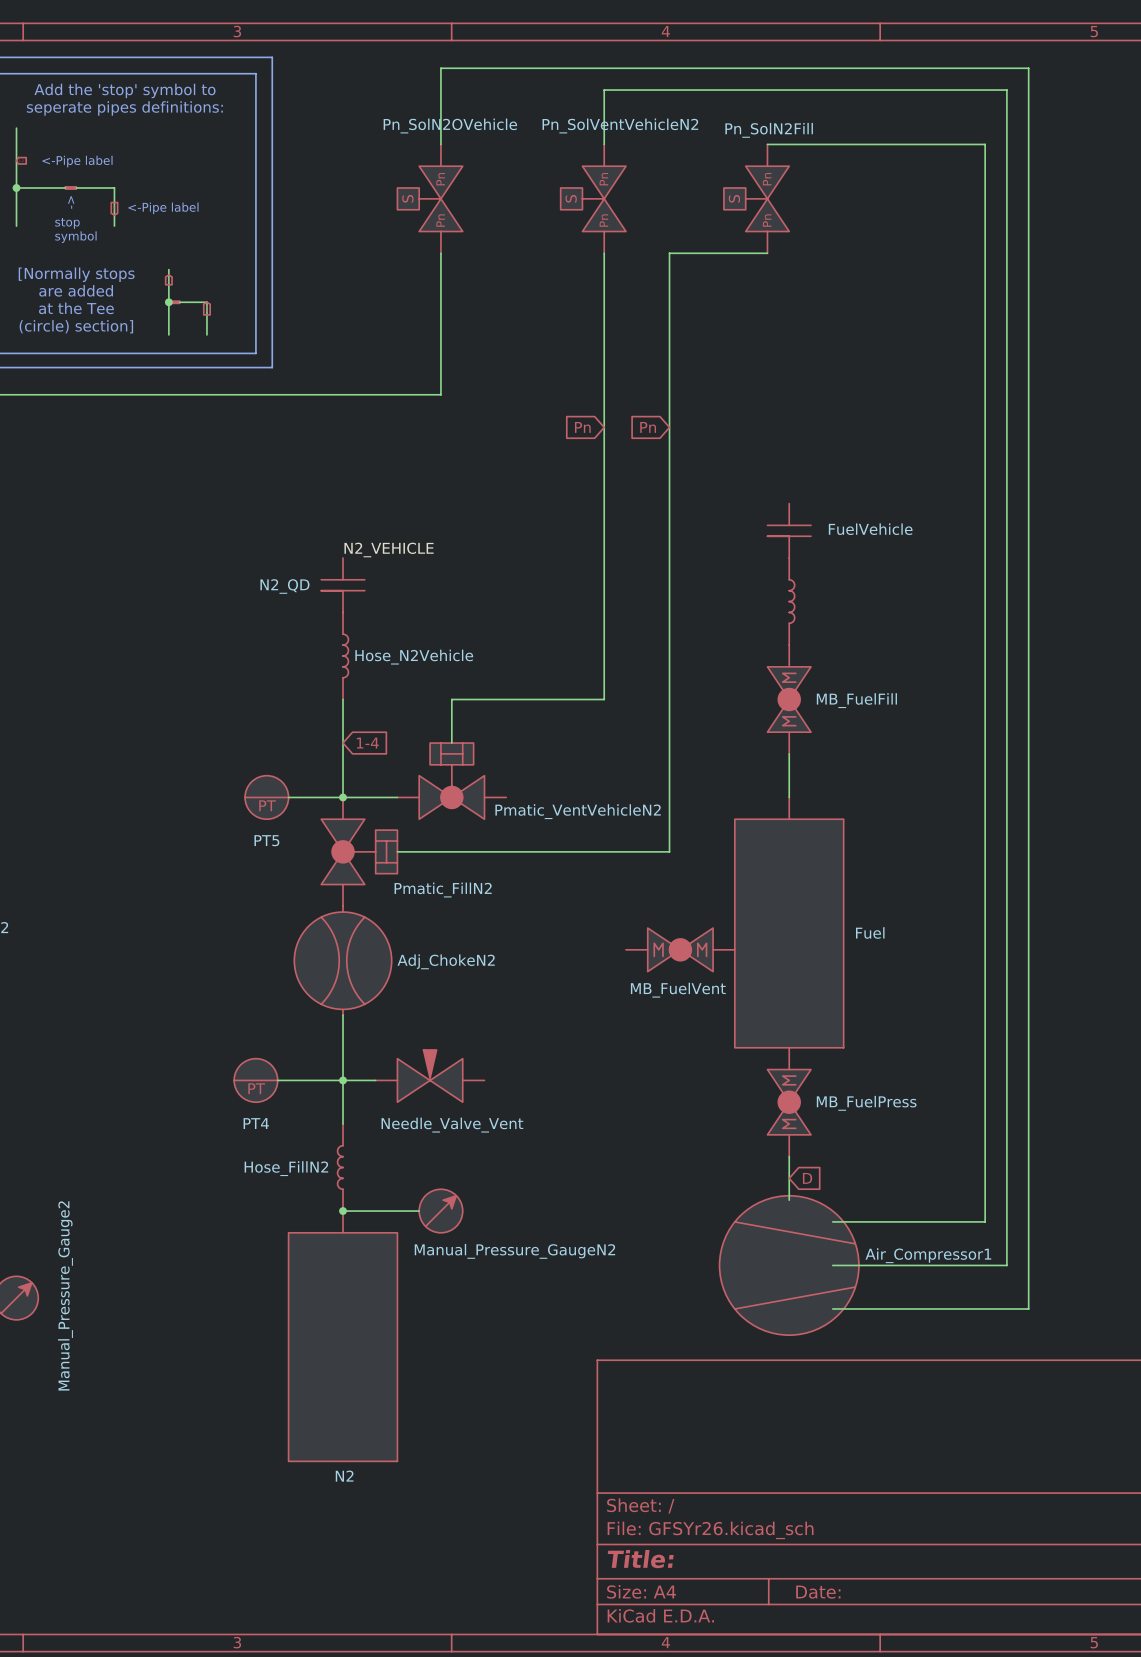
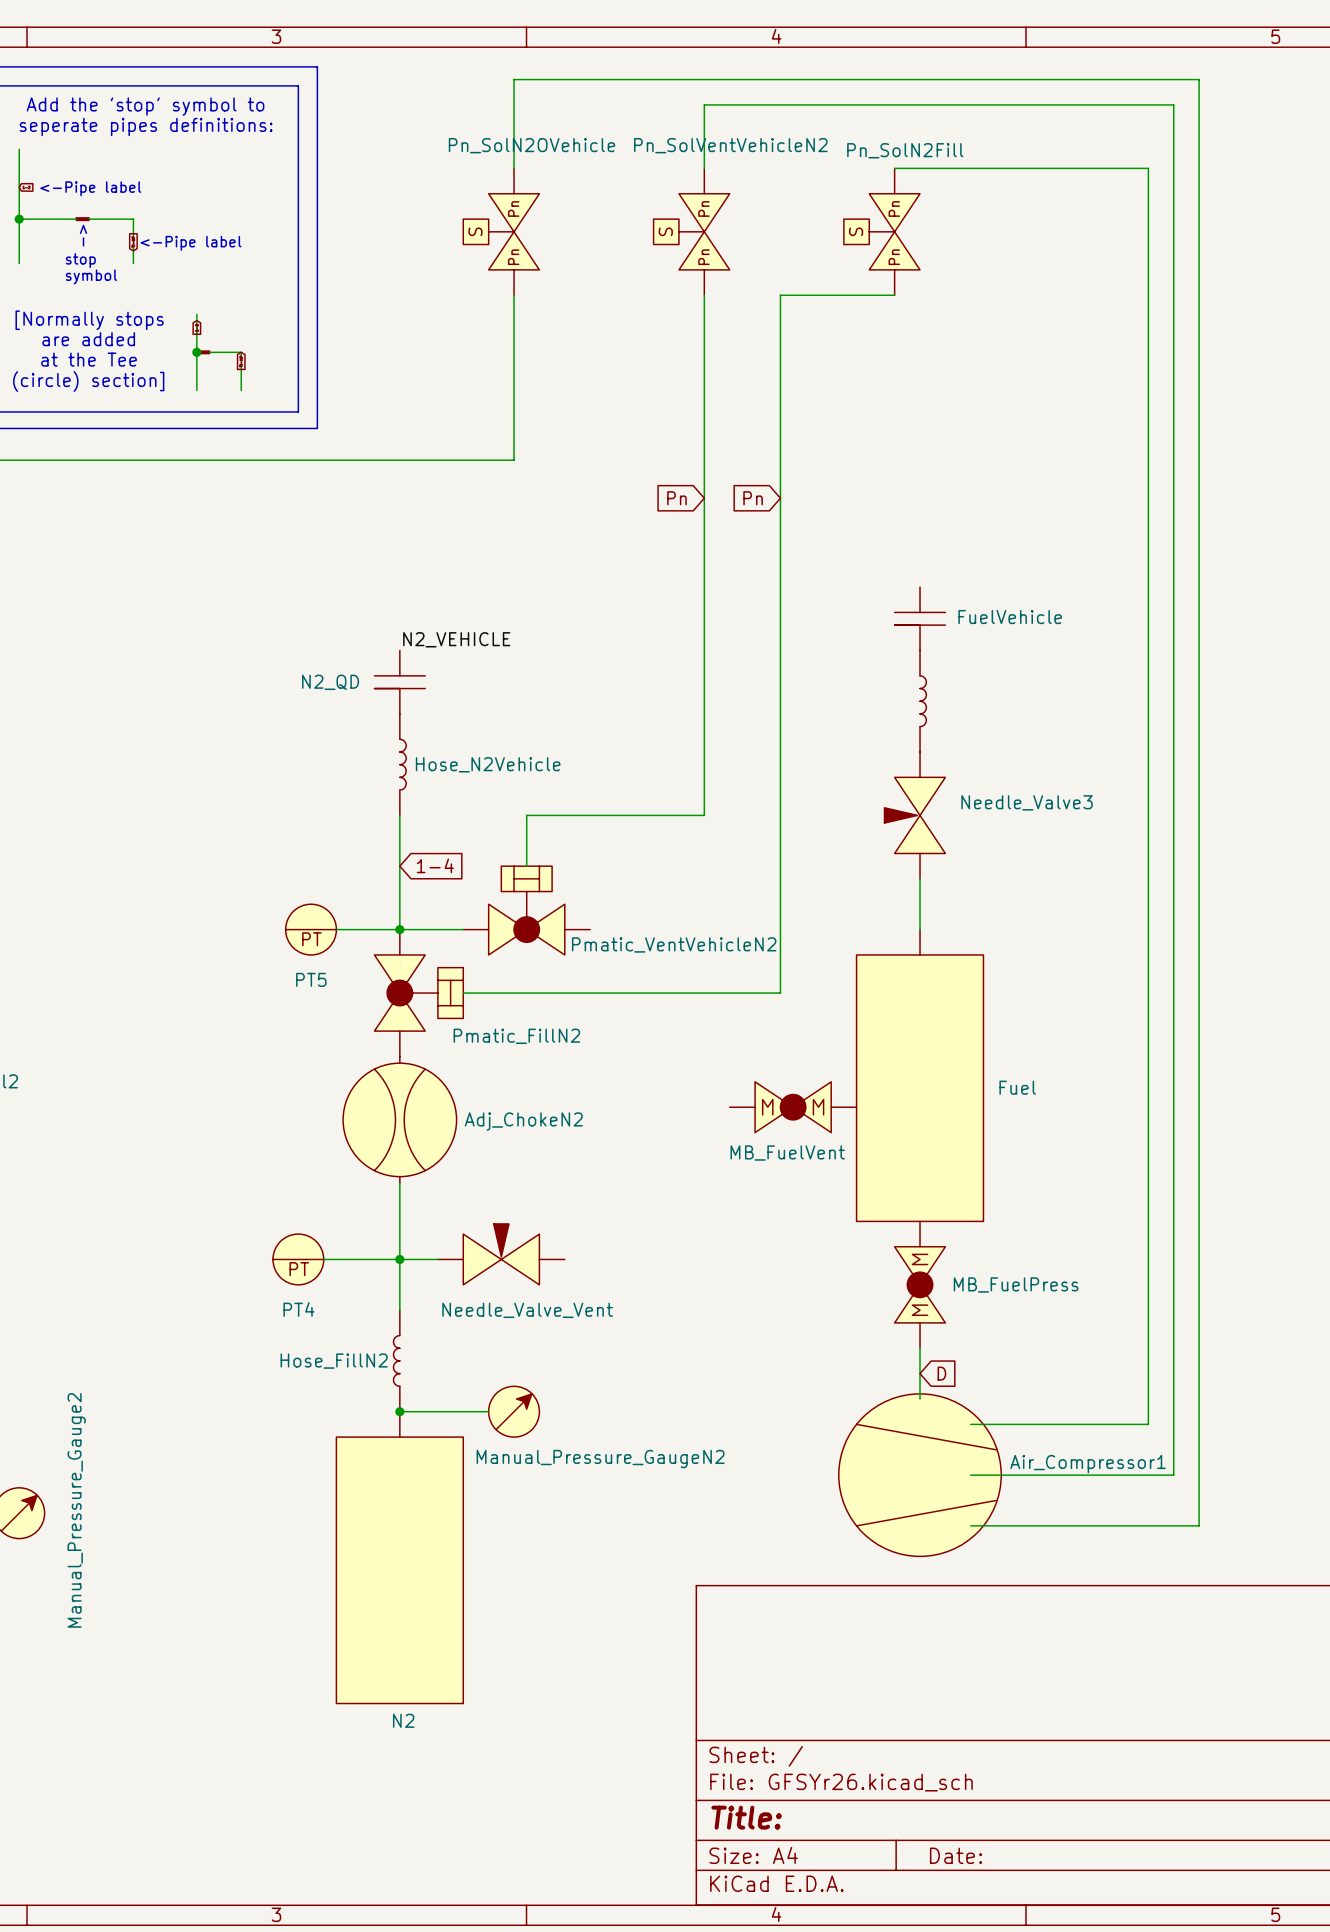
Needle_Valve3: none -> (914, 815)
MB_FuelFill: (789, 699) -> none

